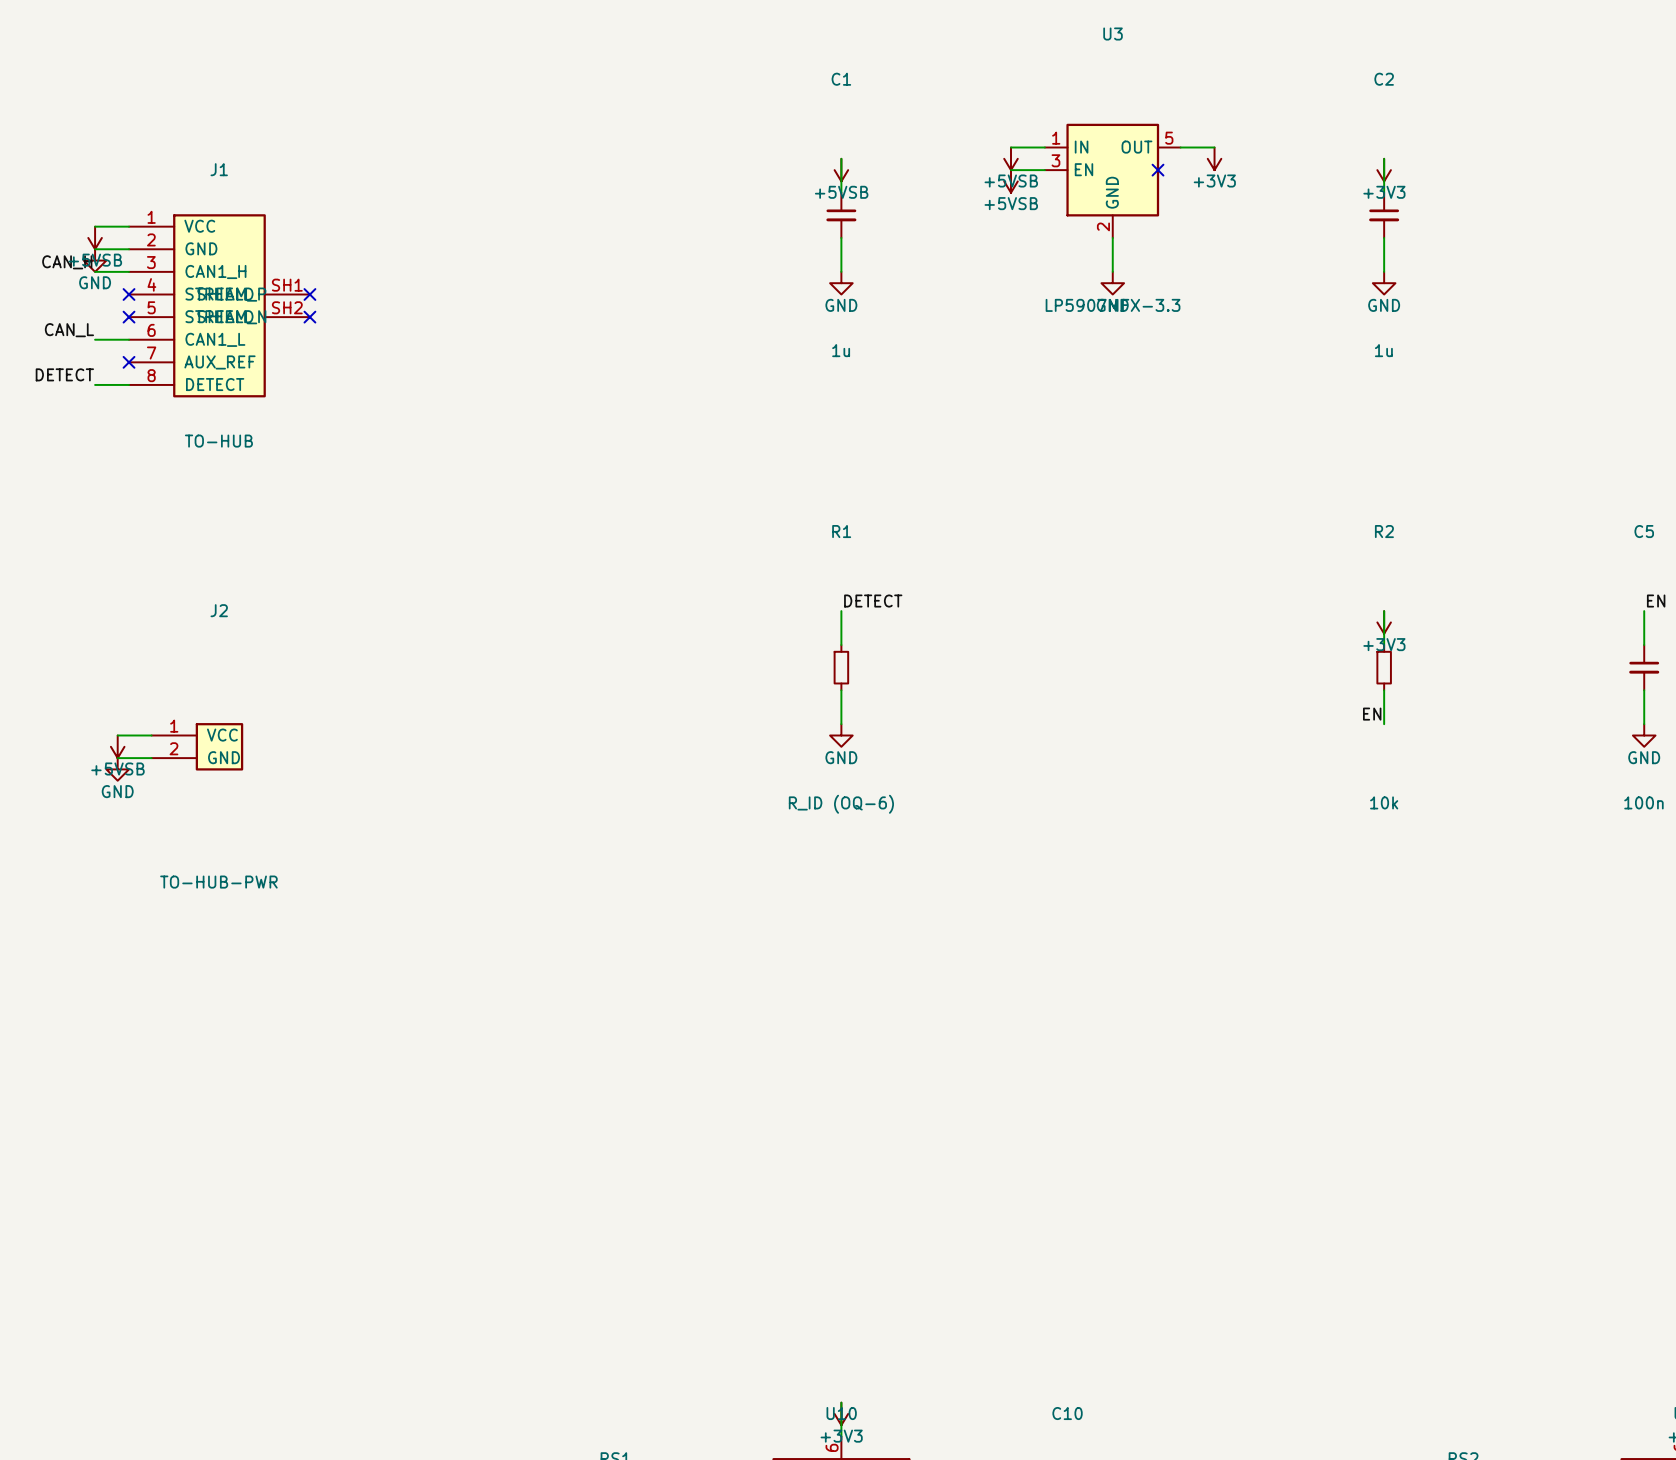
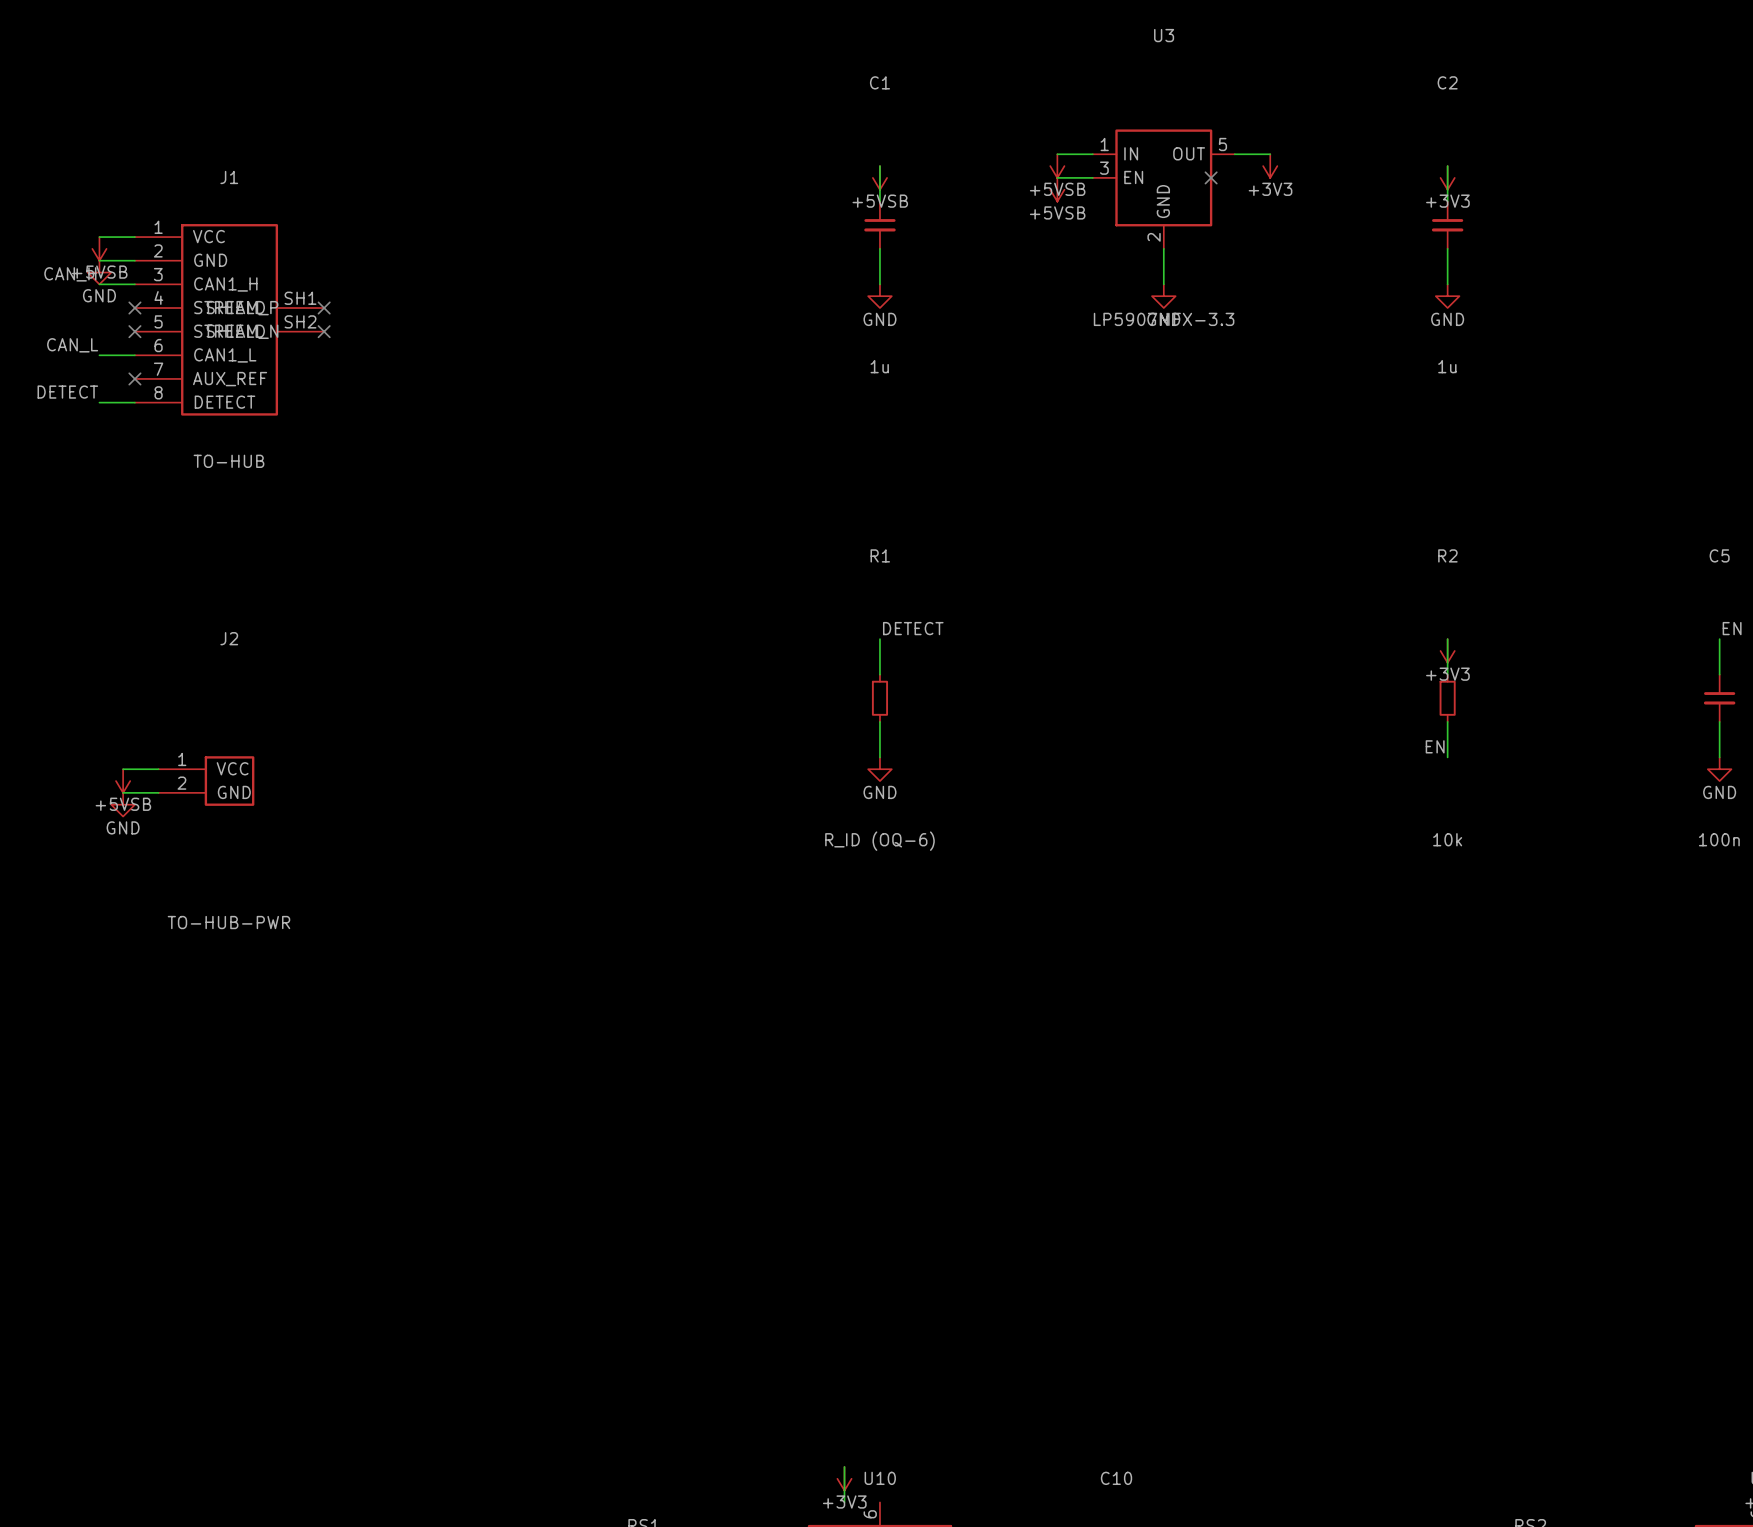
wire: (841, 1402) (841, 1436) -> (844, 1466) (844, 1502)
power symbol position: +3V3 (841, 1413) -> +3V3 (844, 1478)

